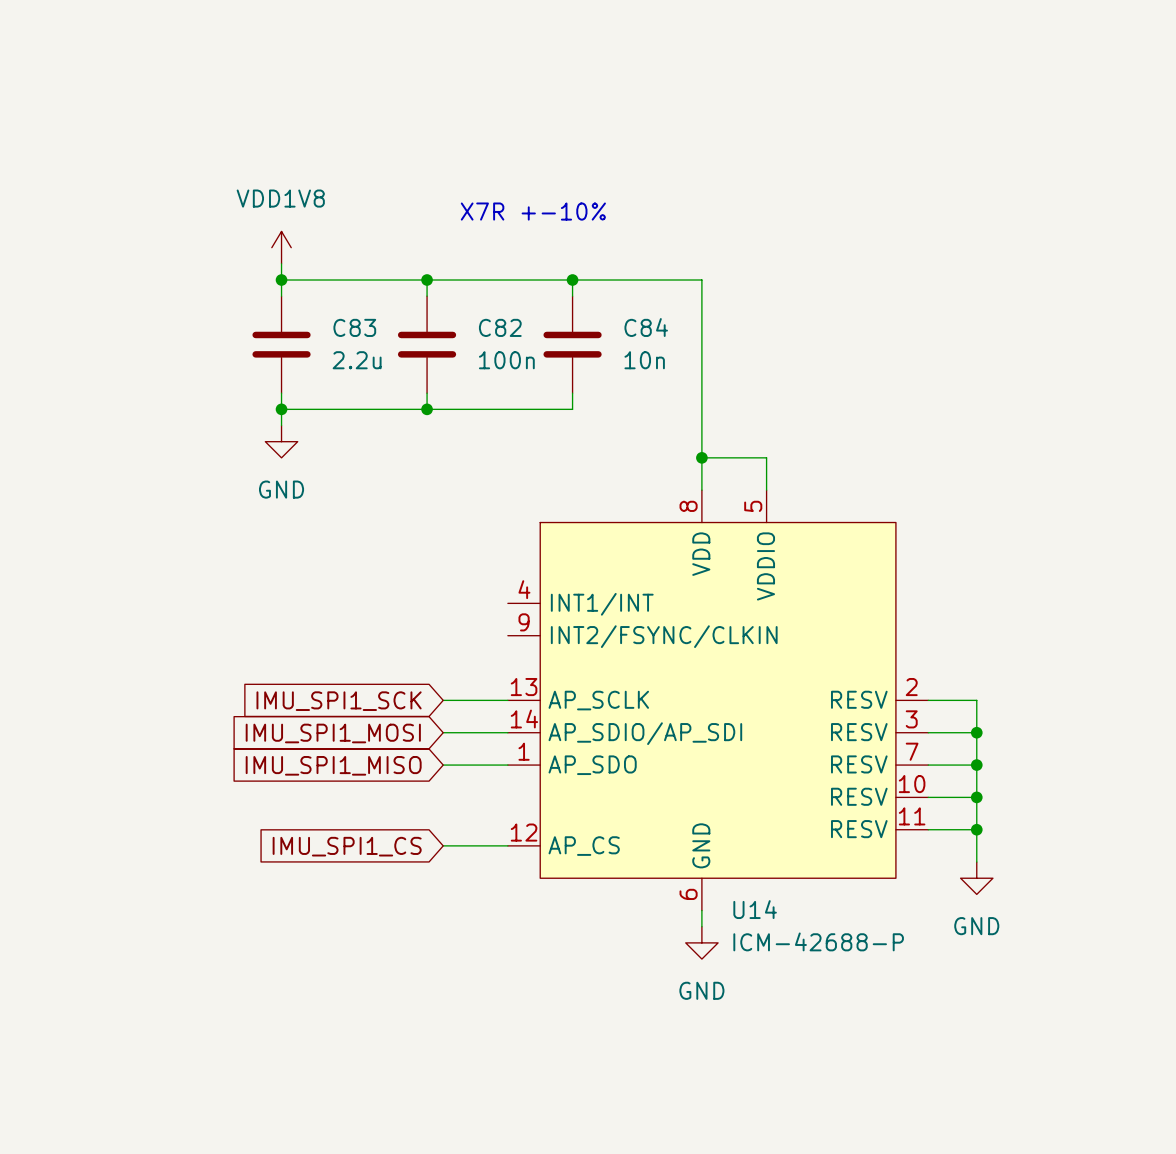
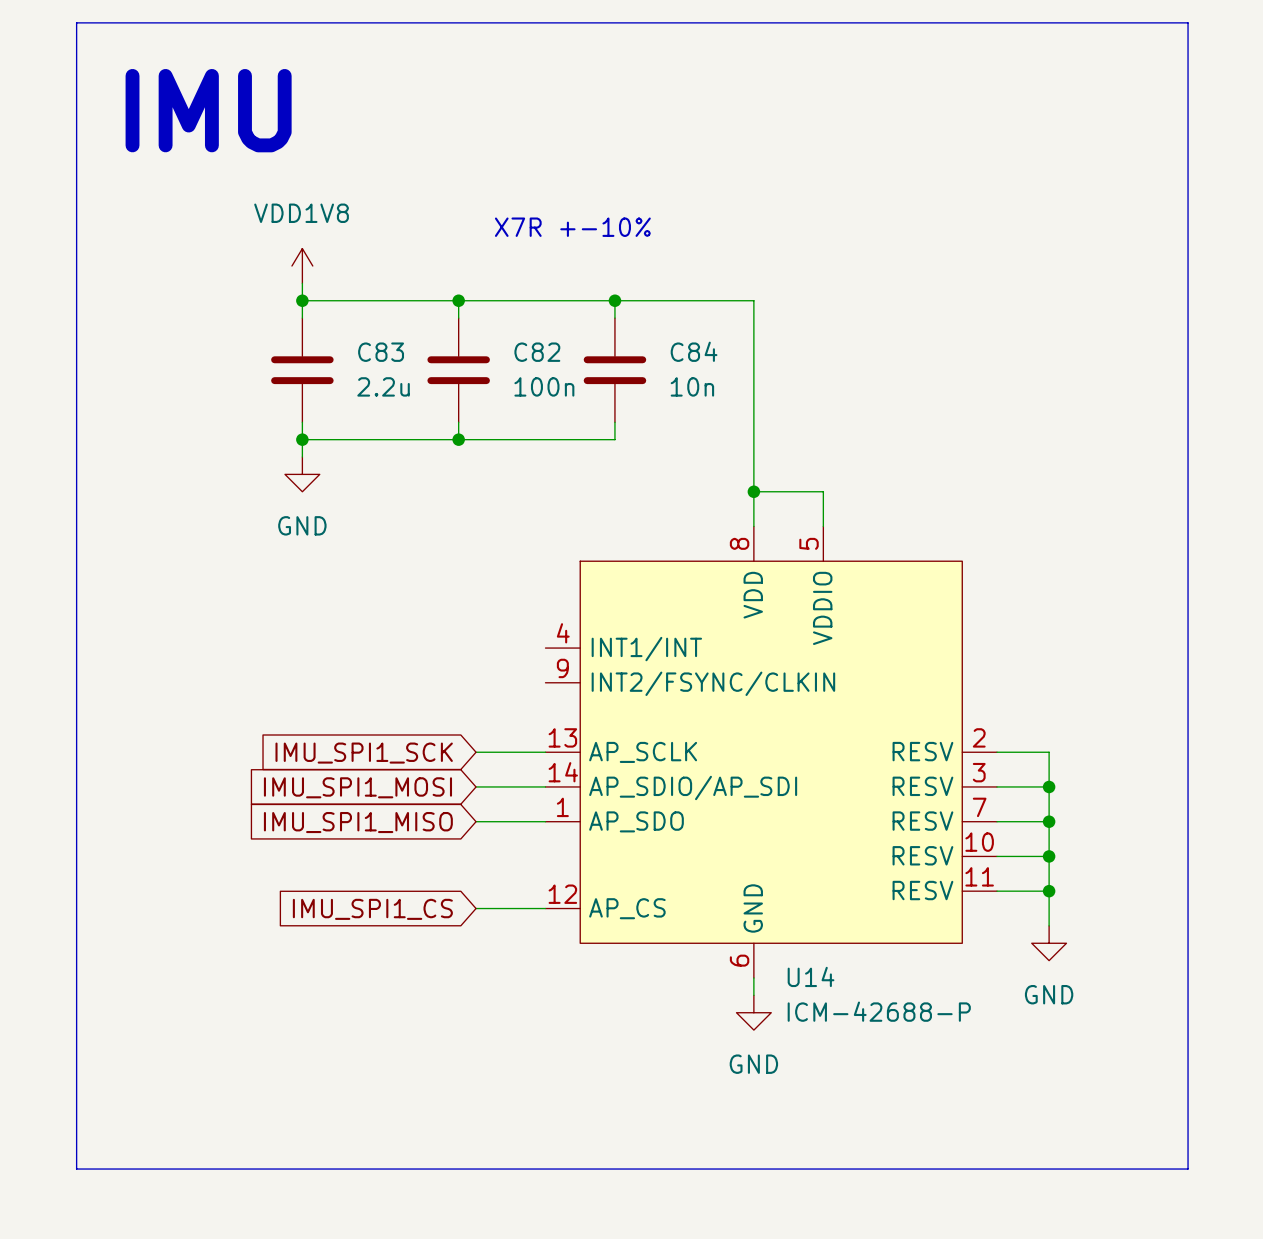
line: none -> (76, 22) (1188, 22) (1188, 1169) (76, 1169) (76, 22)
text: none -> IMU (208, 110)

